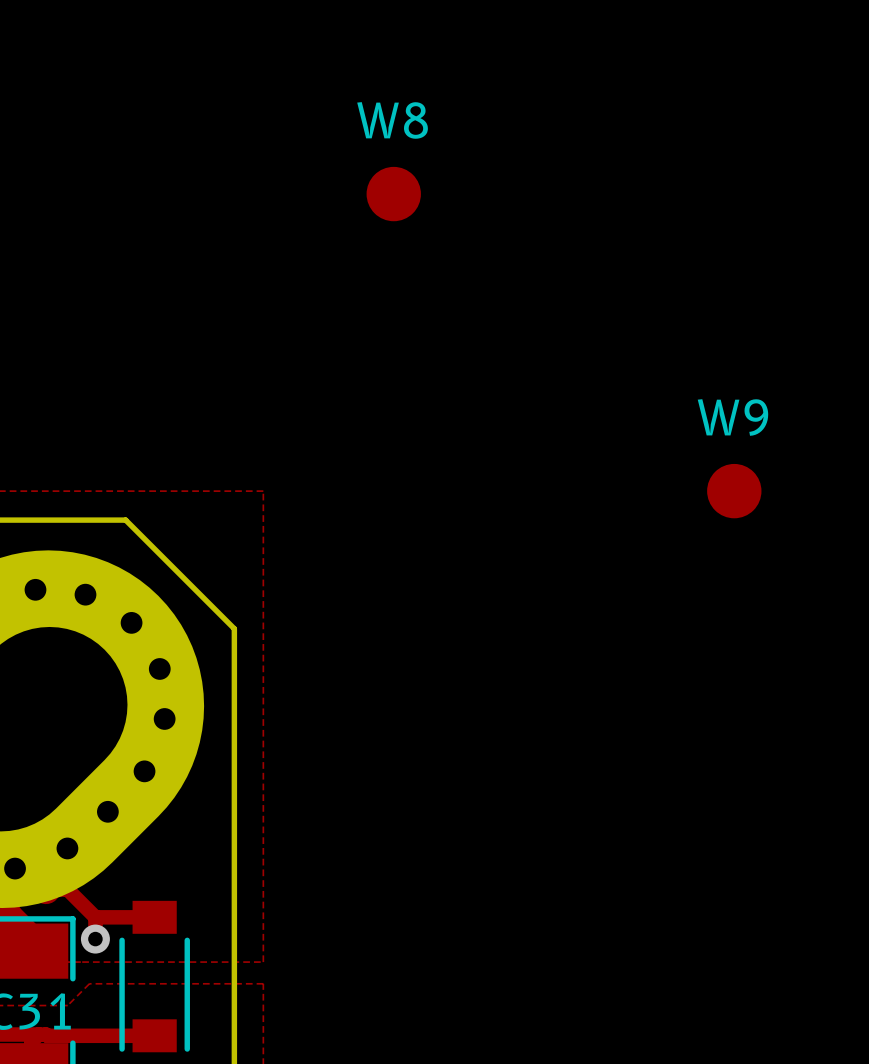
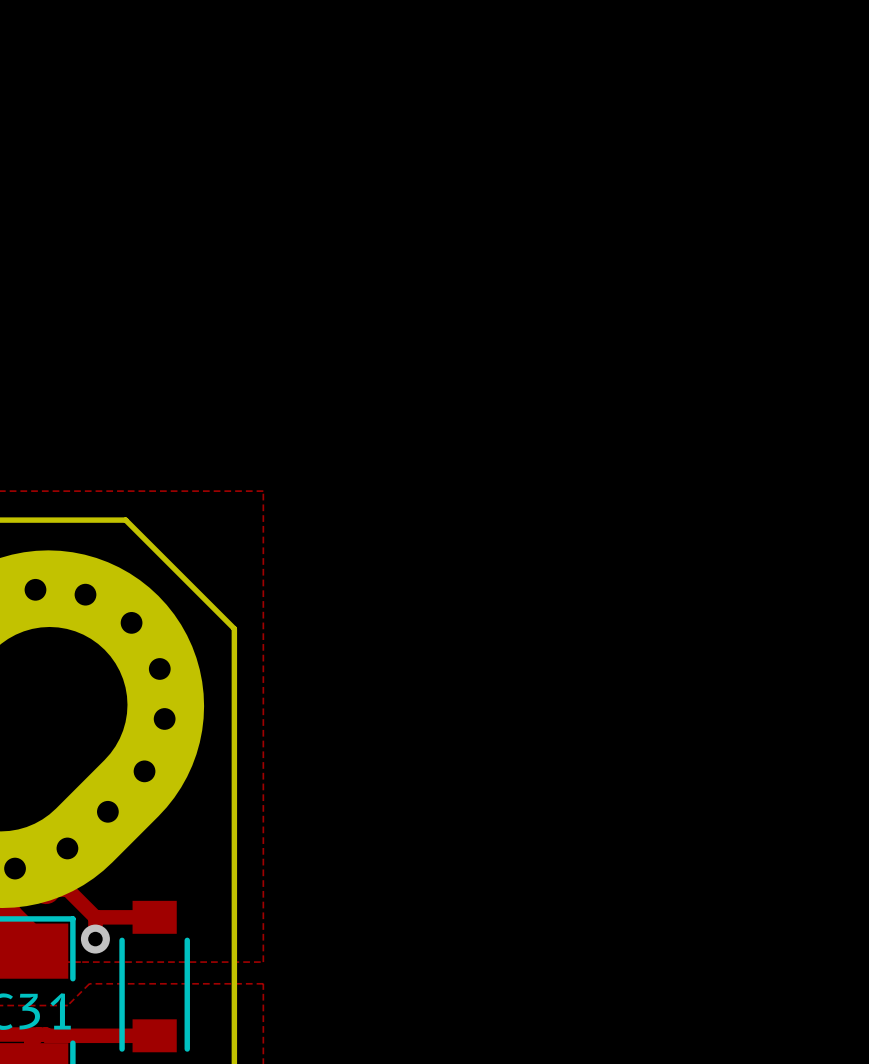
W8: (393, 194) -> none
W9: (734, 491) -> none

